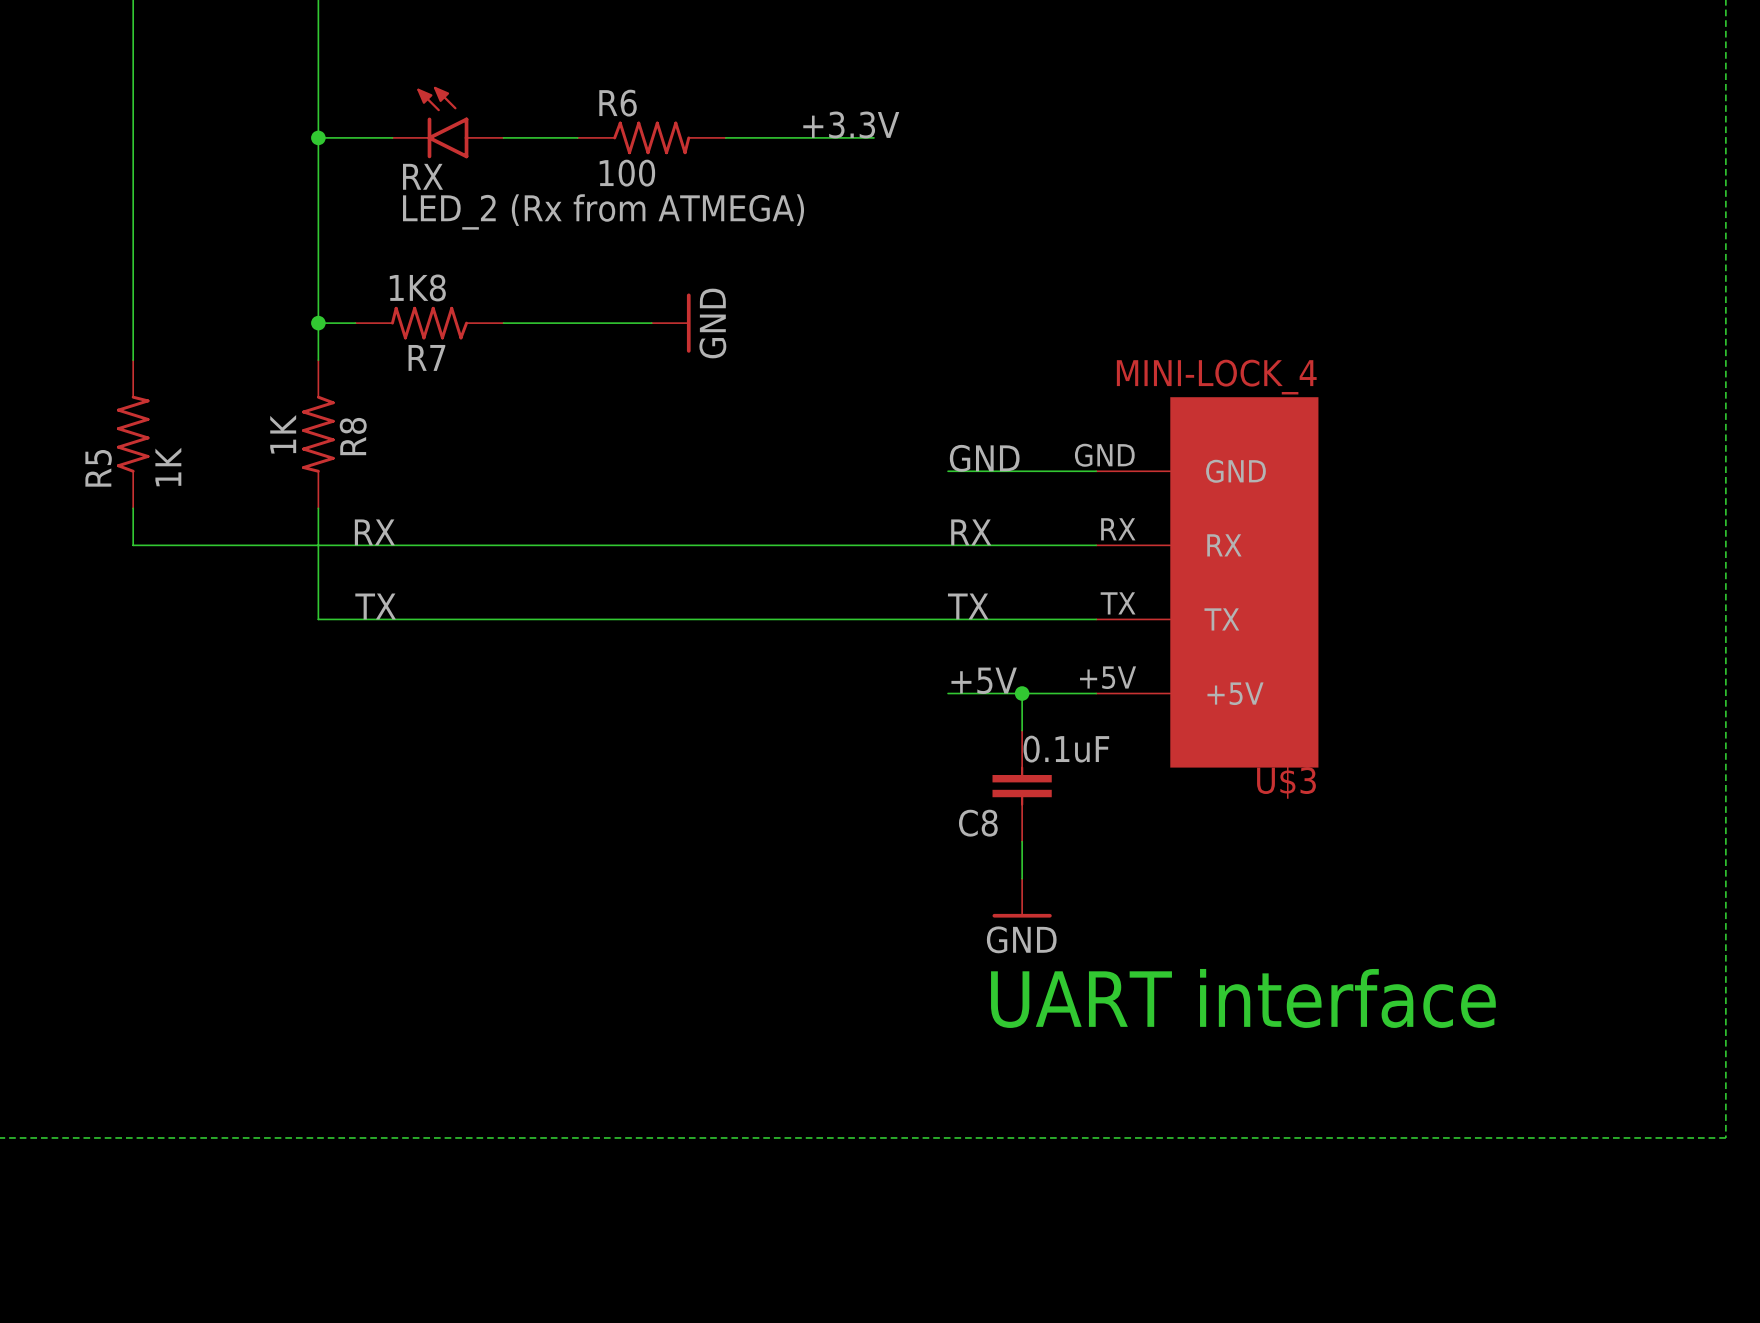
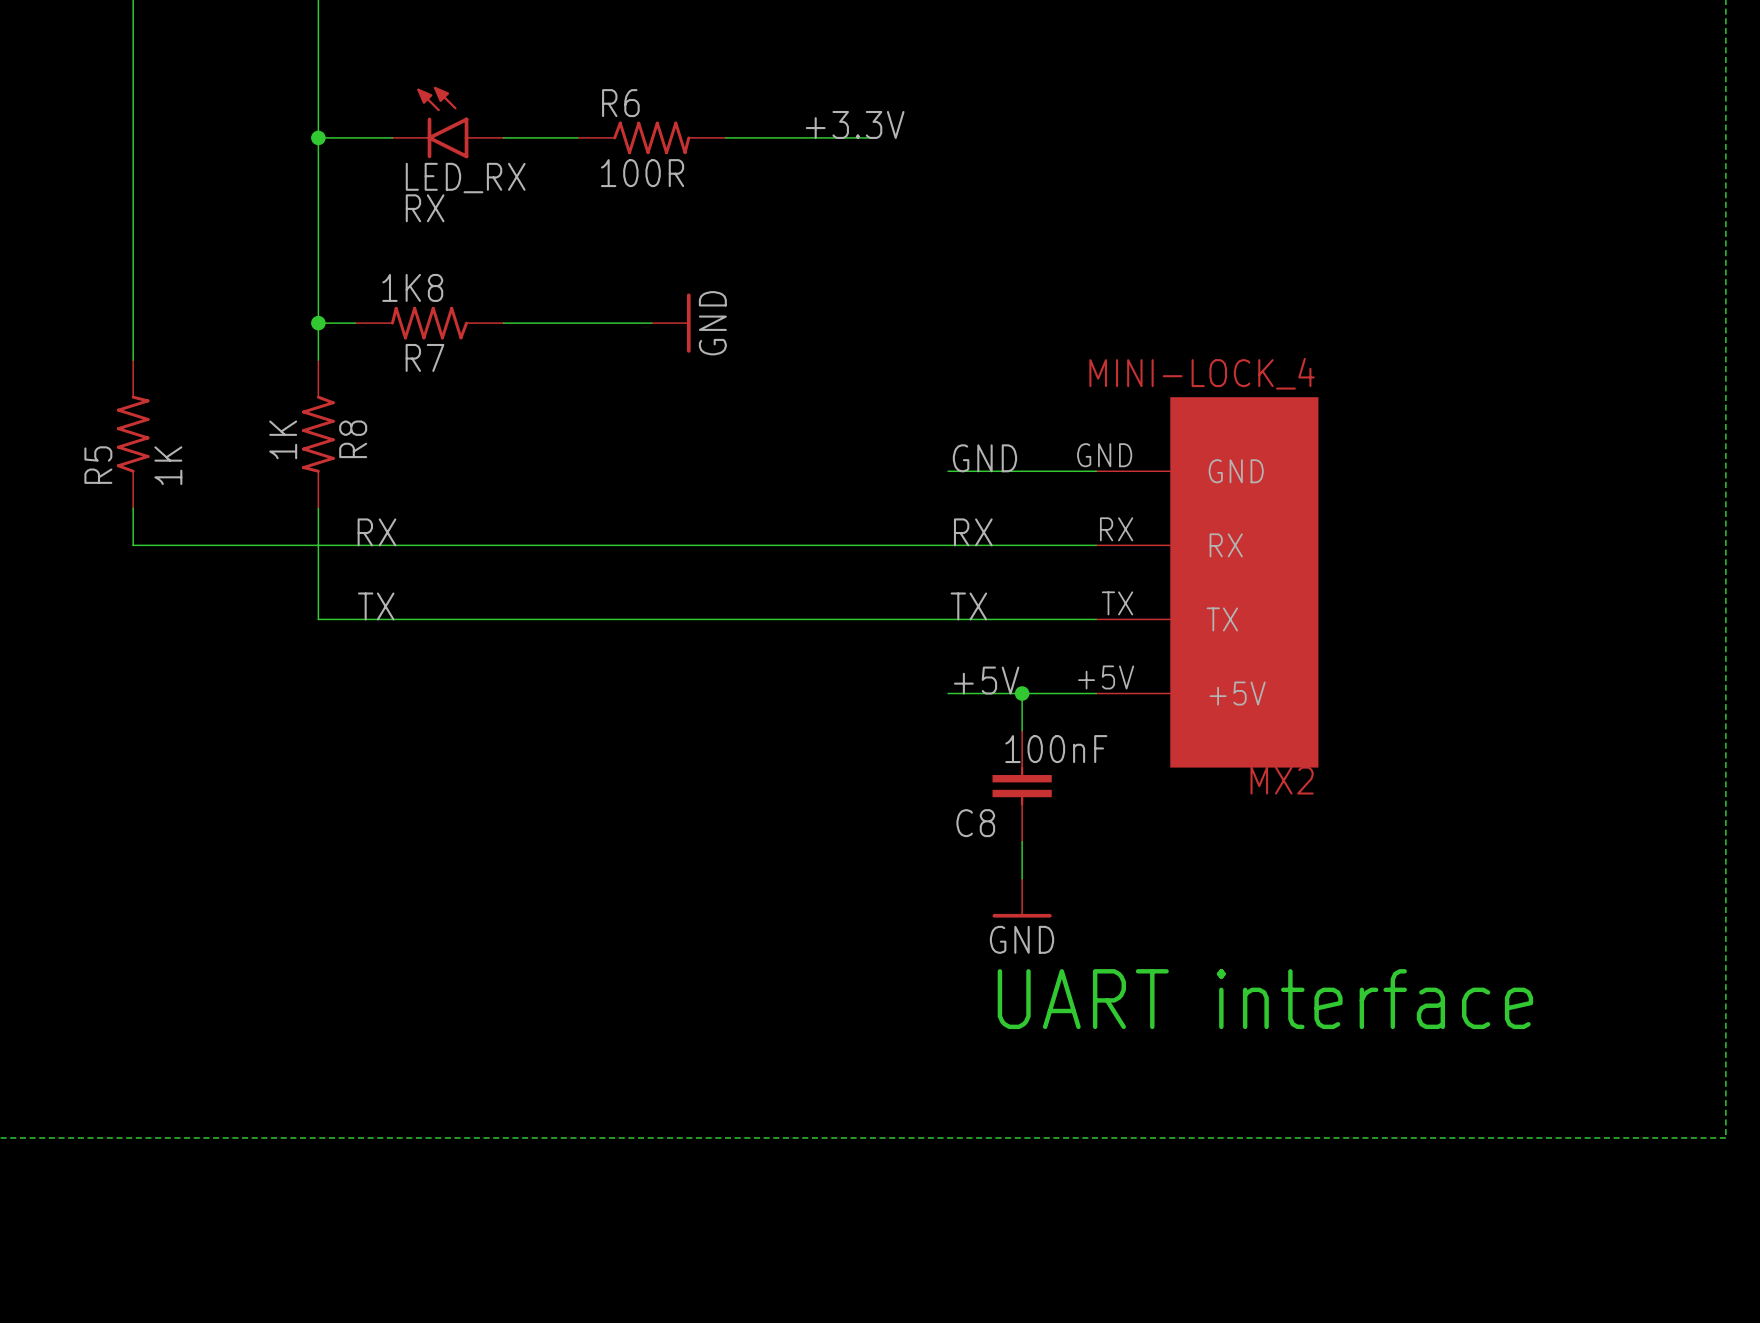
R6 value: 100 (627, 173) -> 100R (642, 173)
RX name: RX (423, 176) -> LED_RX (465, 178)
RX value: LED_2 (Rx from ATMEGA) (603, 211) -> RX (425, 208)
C8 value: 0.1uF (1066, 749) -> 100nF (1056, 749)
U$3 name: U$3 (1286, 782) -> MX2 (1282, 780)

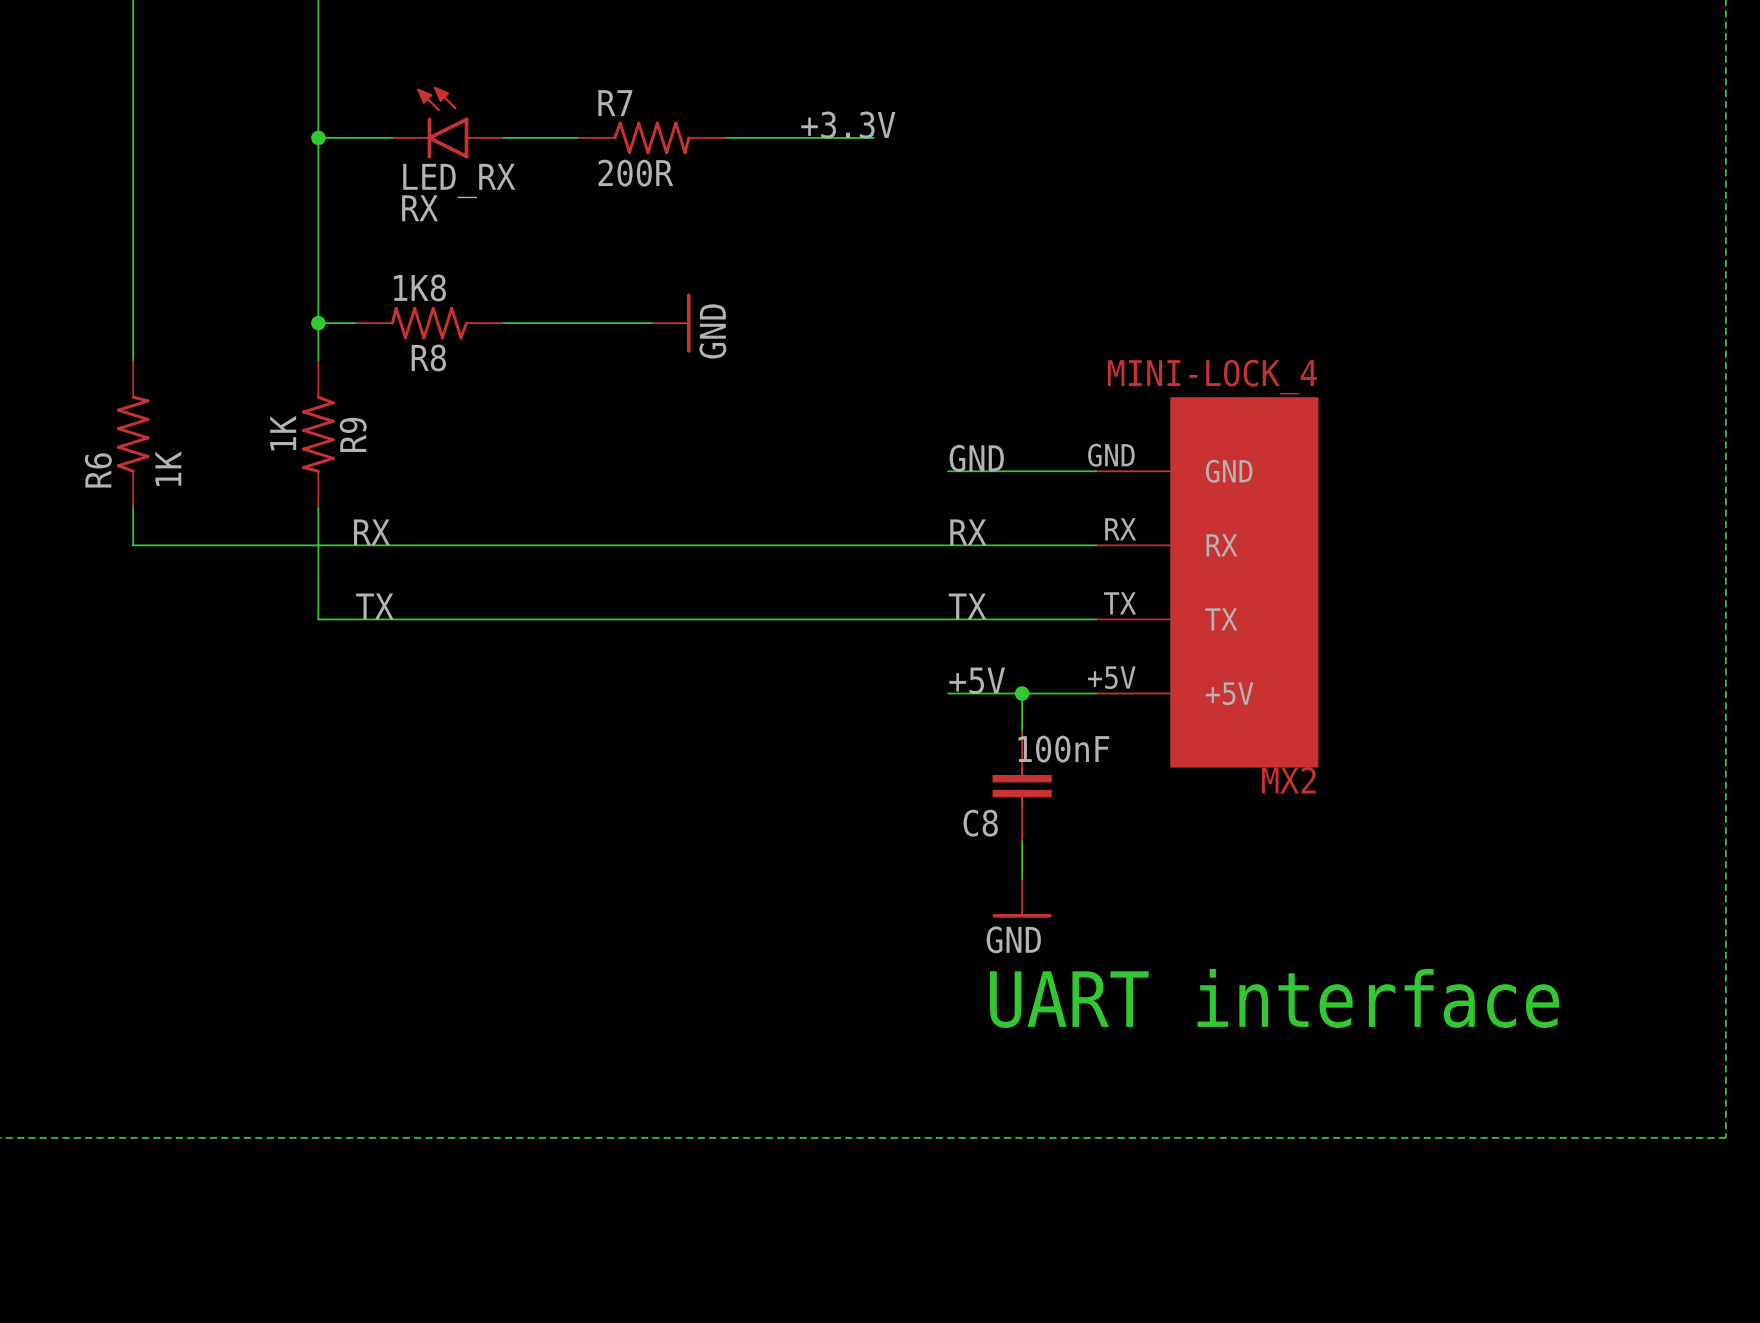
R6 name: R6 (620, 103) -> R7 (615, 103)
R6 value: 100R (642, 173) -> 200R (635, 173)
R7 name: R7 (424, 357) -> R8 (428, 357)
R8 name: R8 (353, 439) -> R9 (353, 434)
R5 name: R5 (98, 465) -> R6 (98, 470)

